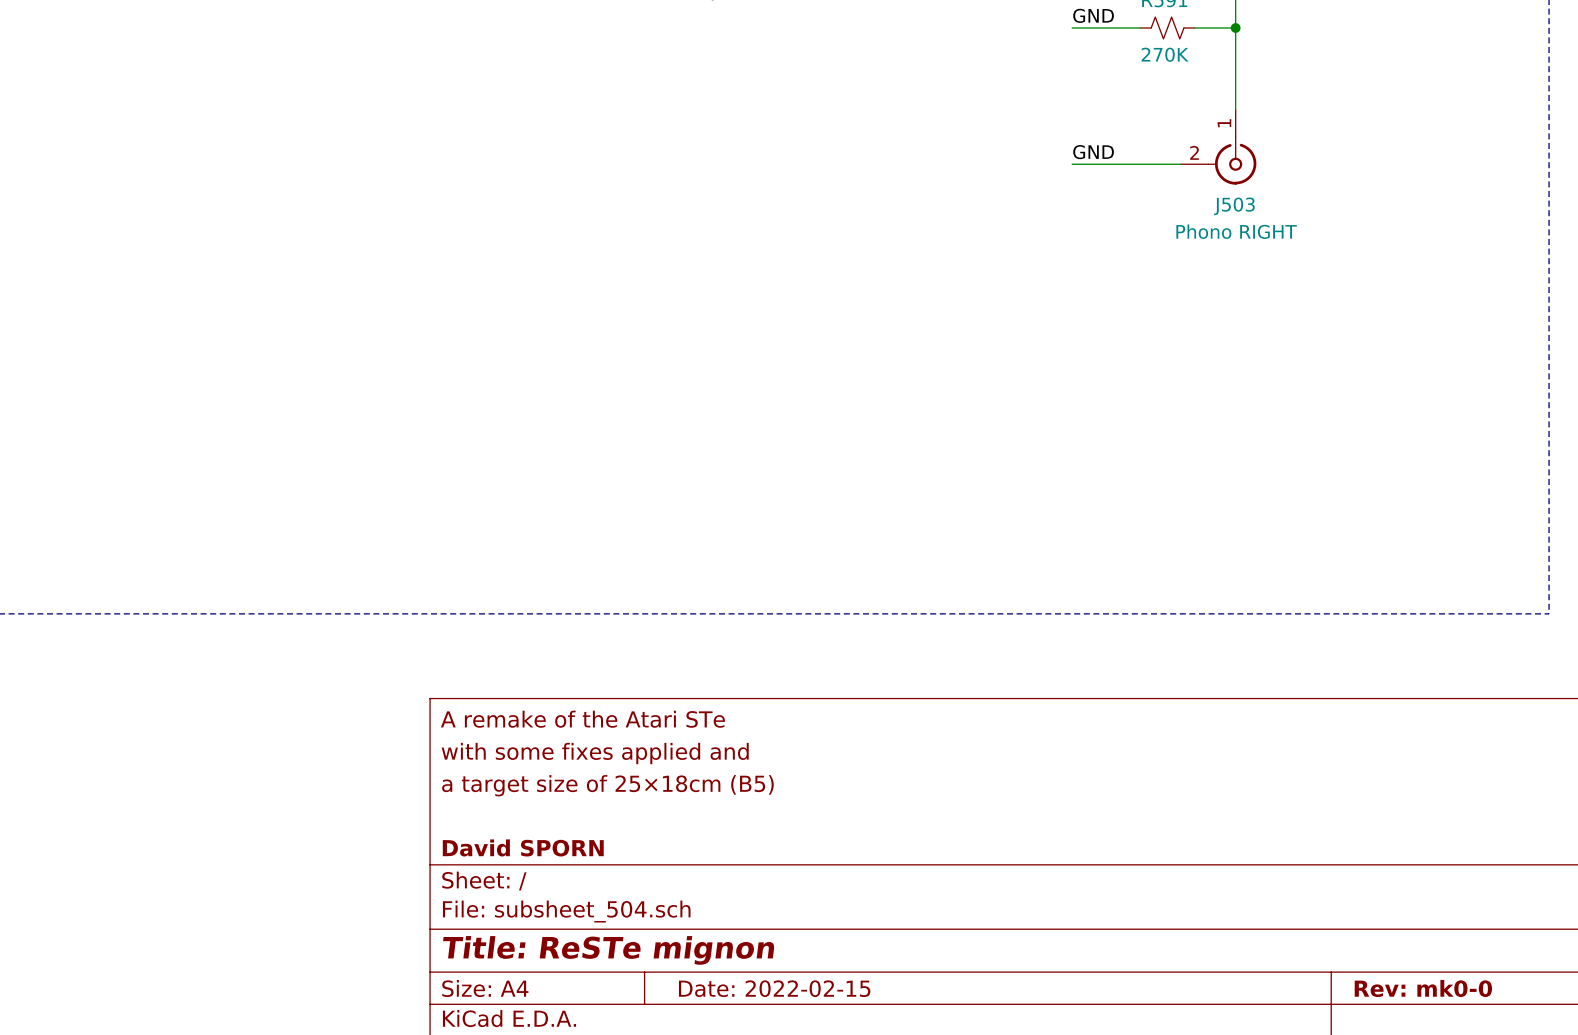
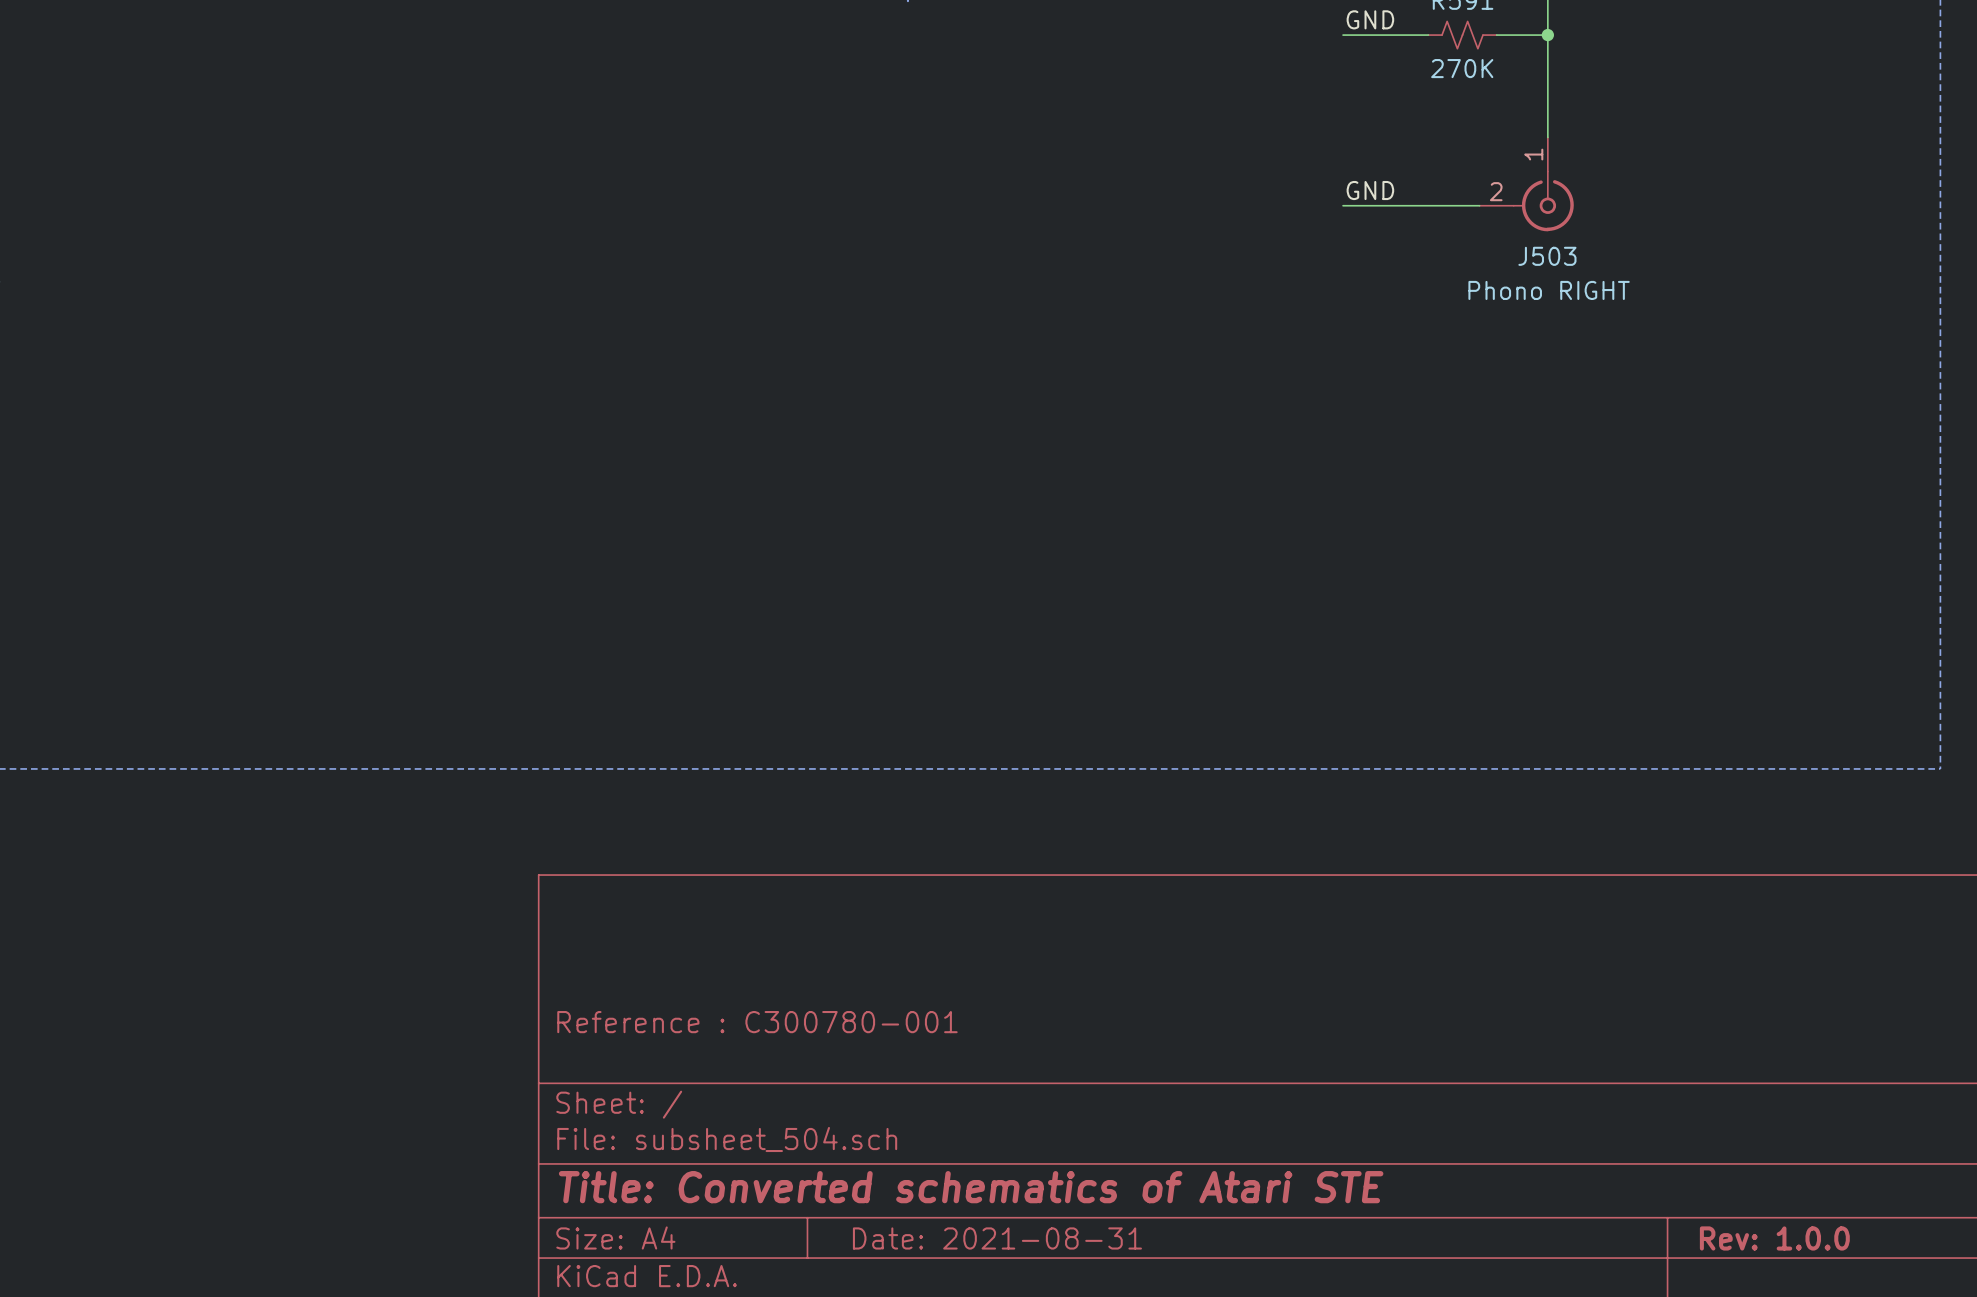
title block: A remake of the Atari STe (582, 719) -> none
title block: with some fixes applied and (595, 753) -> none
title block: a target size of 25×18cm (B5) (607, 785) -> none
title block: none -> Reference : C300780-001 (757, 1022)
title block: David SPORN (523, 847) -> none
title block: Title: ReSTe mignon (608, 950) -> Title: Converted schematics of Atari STE (971, 1187)
title block: Date: 2022-02-15 (774, 988) -> Date: 2021-08-31 (997, 1238)
title block: Rev: mk0-0 (1423, 988) -> Rev: 1.0.0 (1774, 1238)

